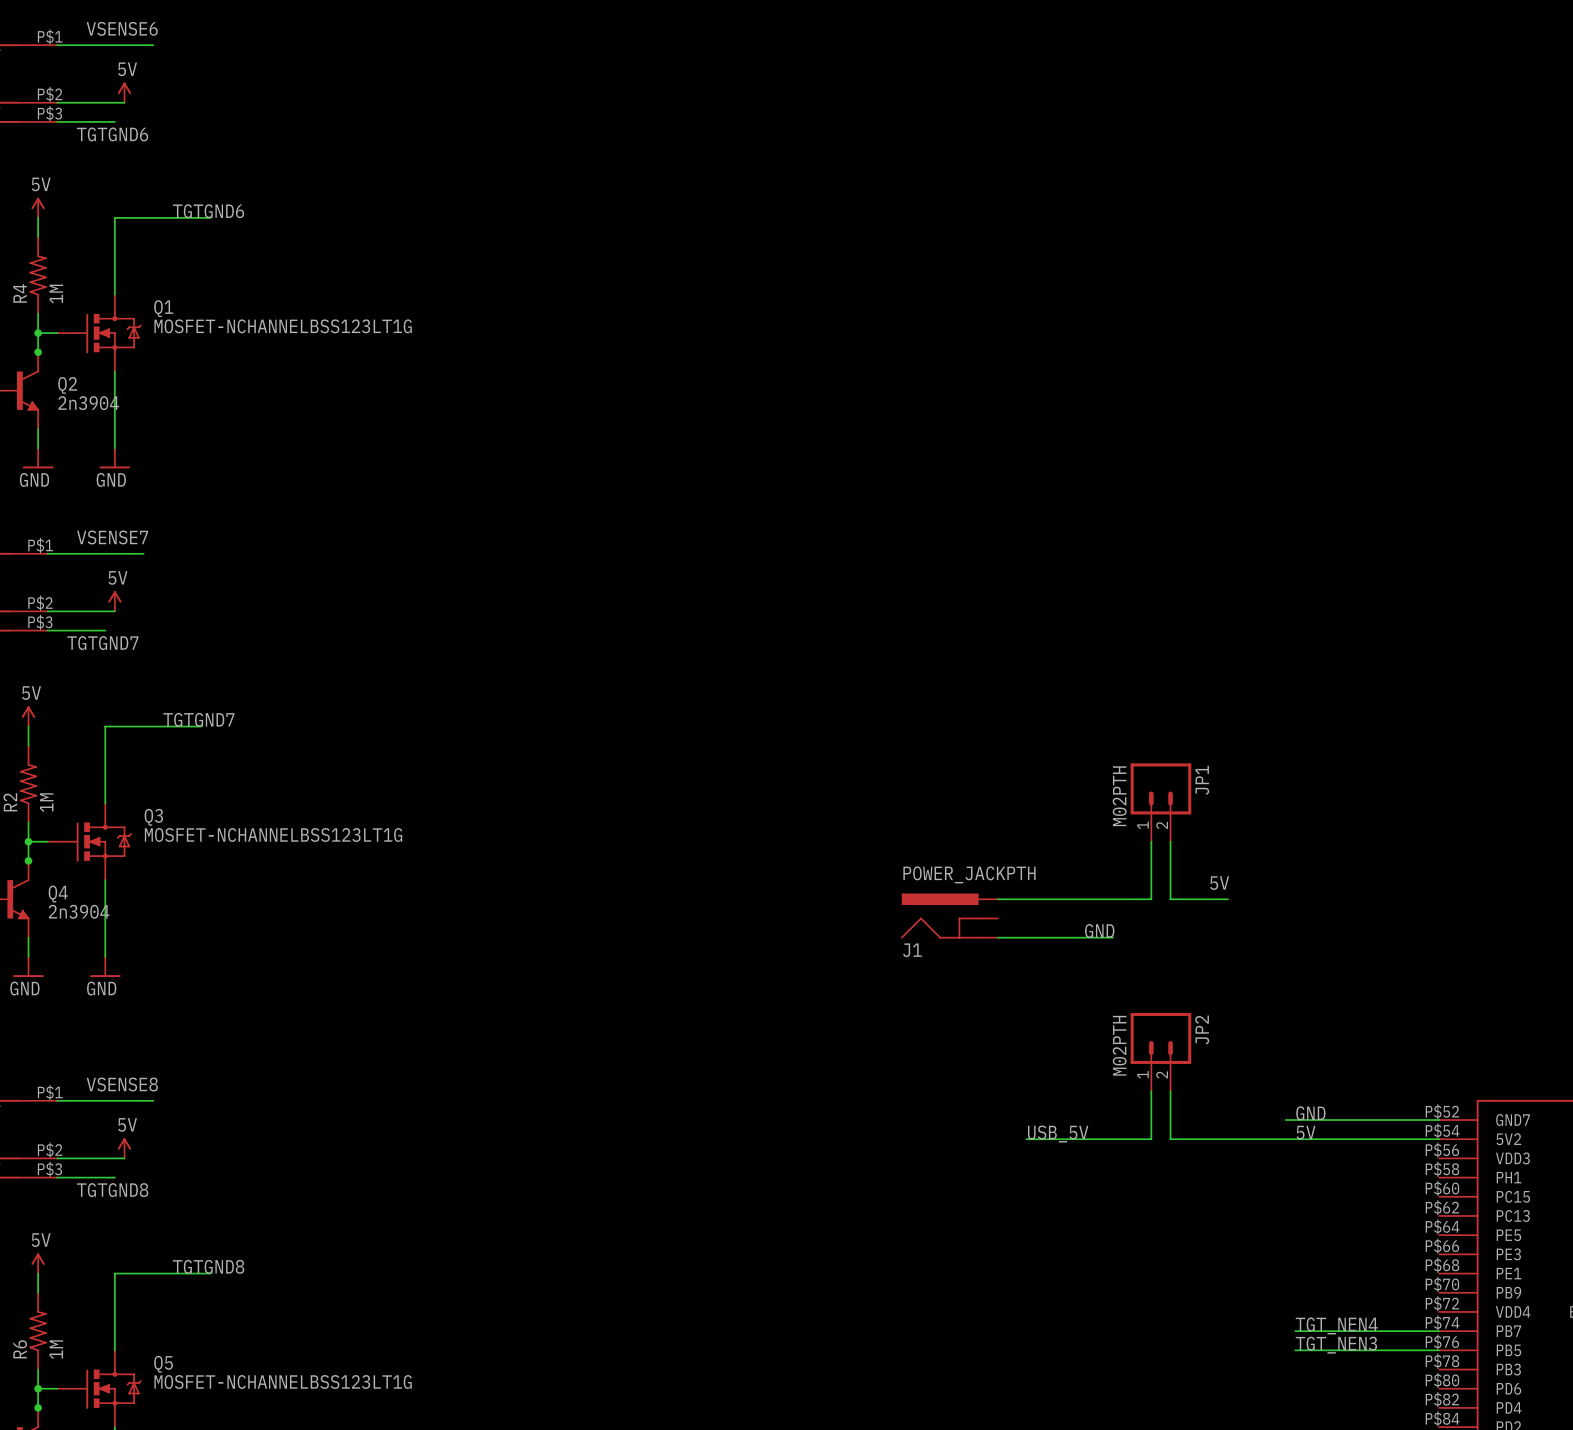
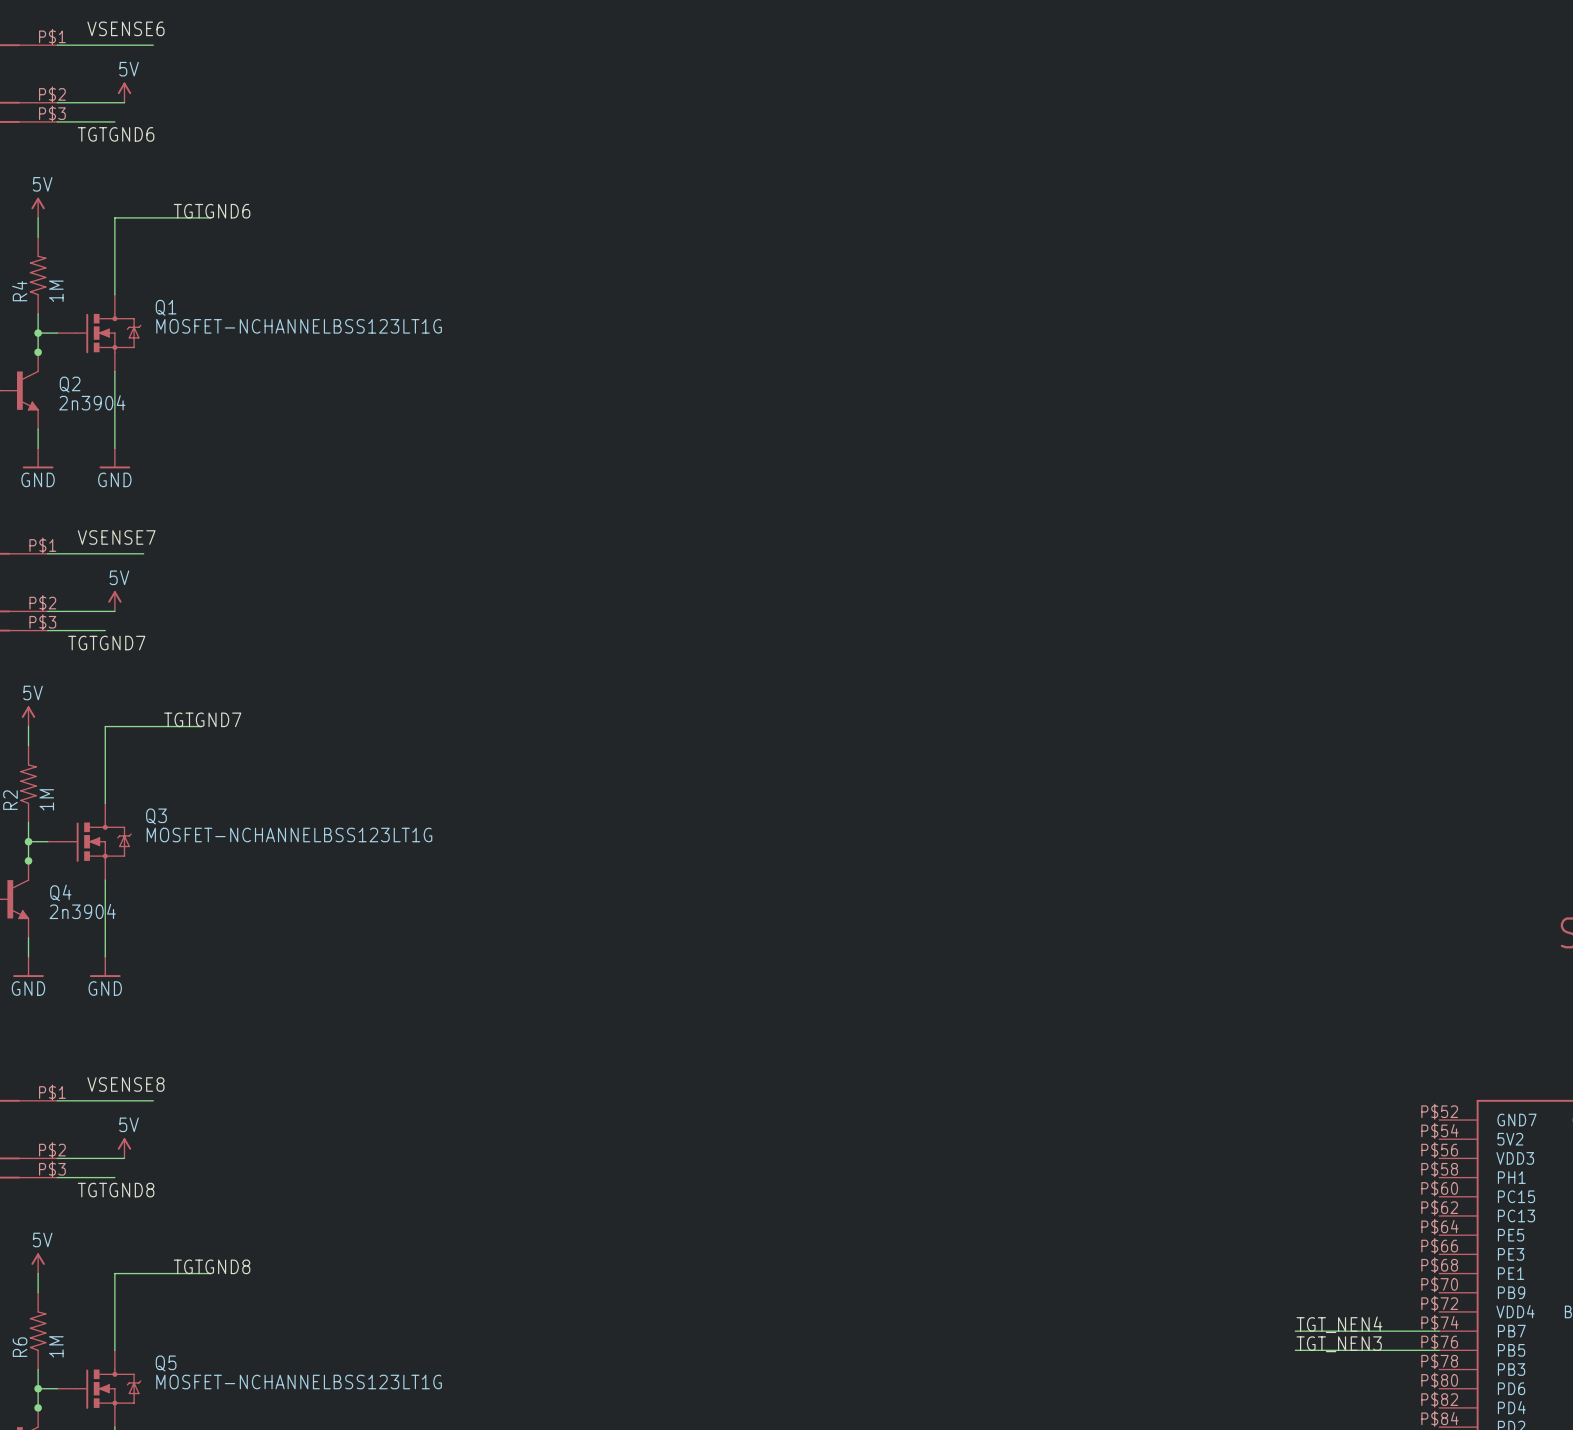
JP1: M02PTH (1160, 802) -> none
wire: (1151, 841) (1151, 899) (997, 899) -> none
wire: (1170, 841) (1170, 899) (1228, 899) -> none
label: 5V (1219, 883) -> none
J1: POWER_JACKPTH (949, 915) -> none
label: GND (1099, 930) -> none
wire: (997, 937) (1112, 937) -> none
JP2: M02PTH (1160, 1052) -> none
wire: (1151, 1091) (1151, 1139) (1026, 1139) -> none
wire: (1170, 1091) (1170, 1139) (1439, 1139) -> none
label: GND (1310, 1113) -> none
wire: (1285, 1120) (1439, 1120) -> none
label: 5V (1306, 1132) -> none
label: USB_5V (1058, 1134) -> none

